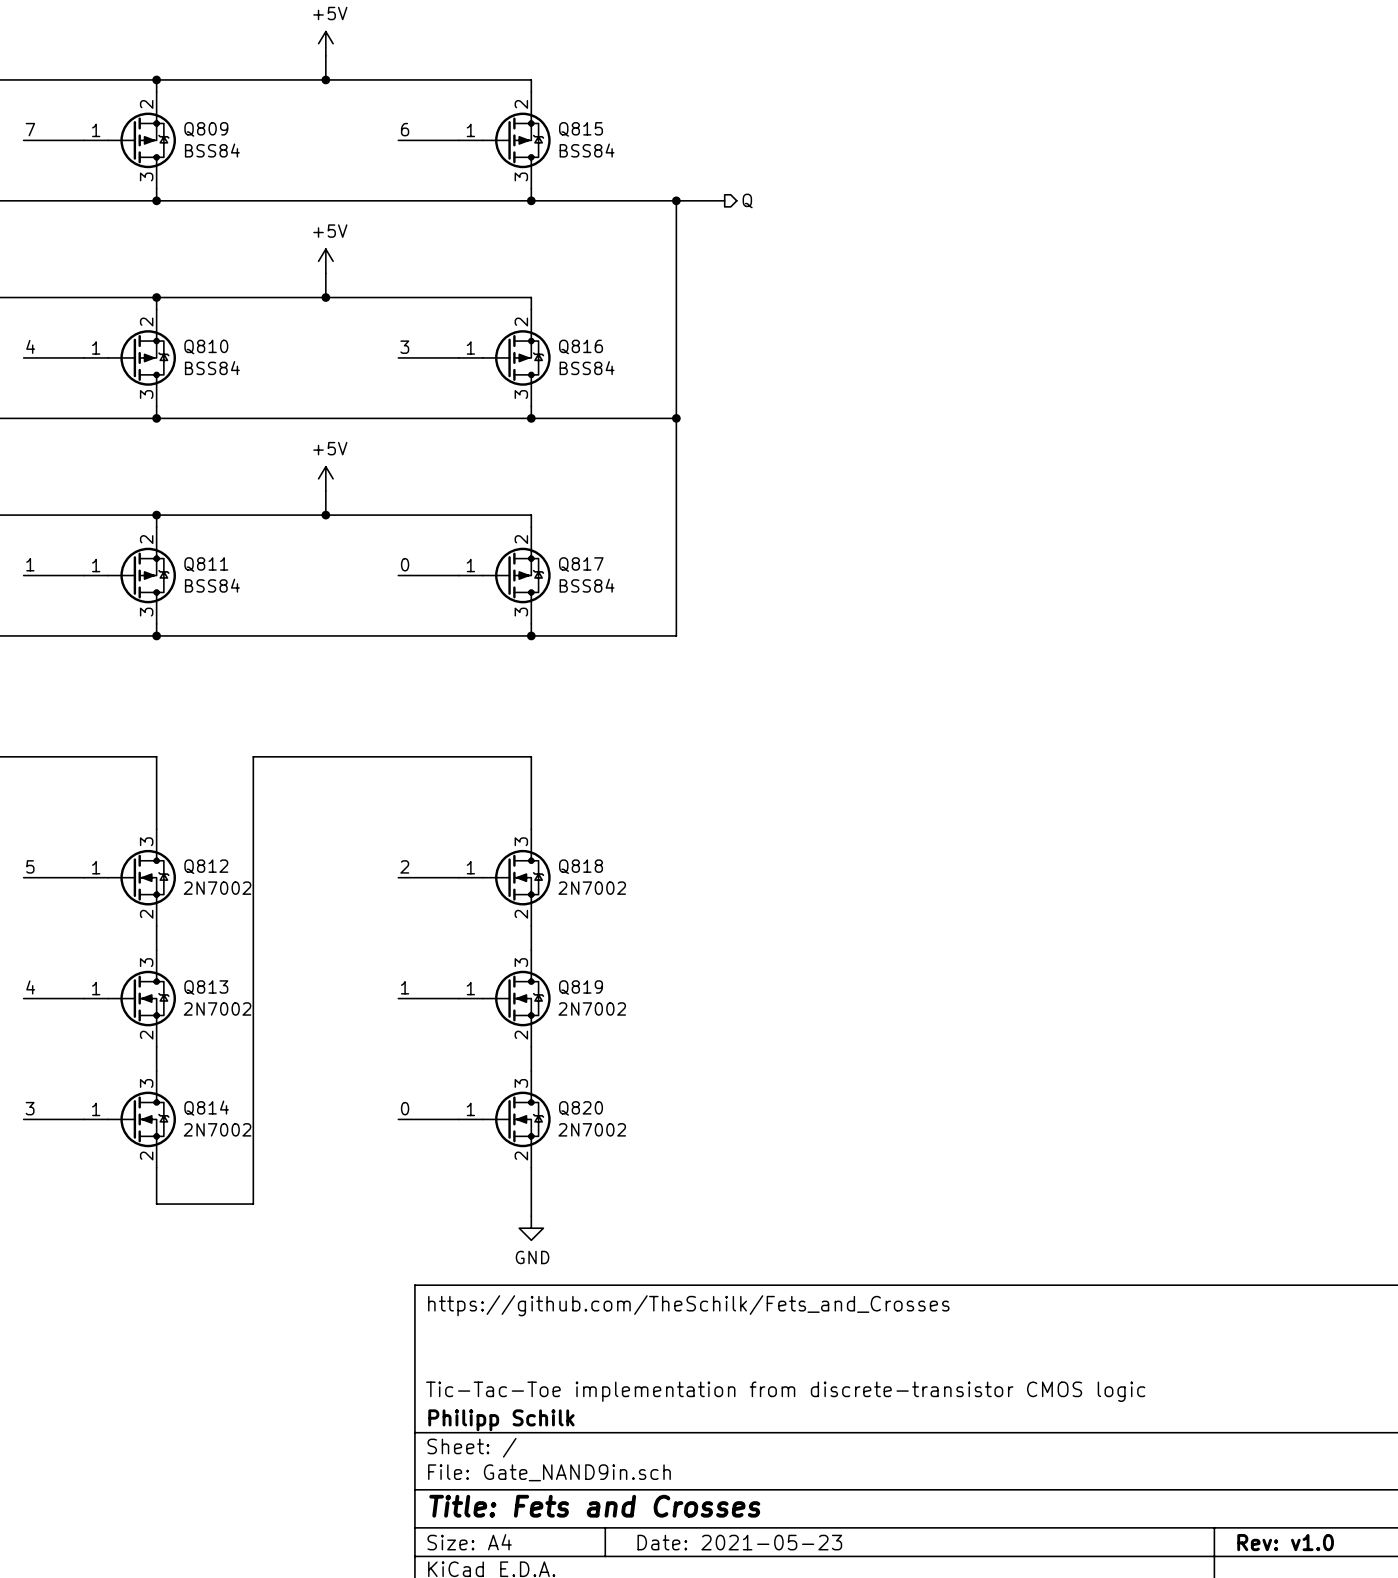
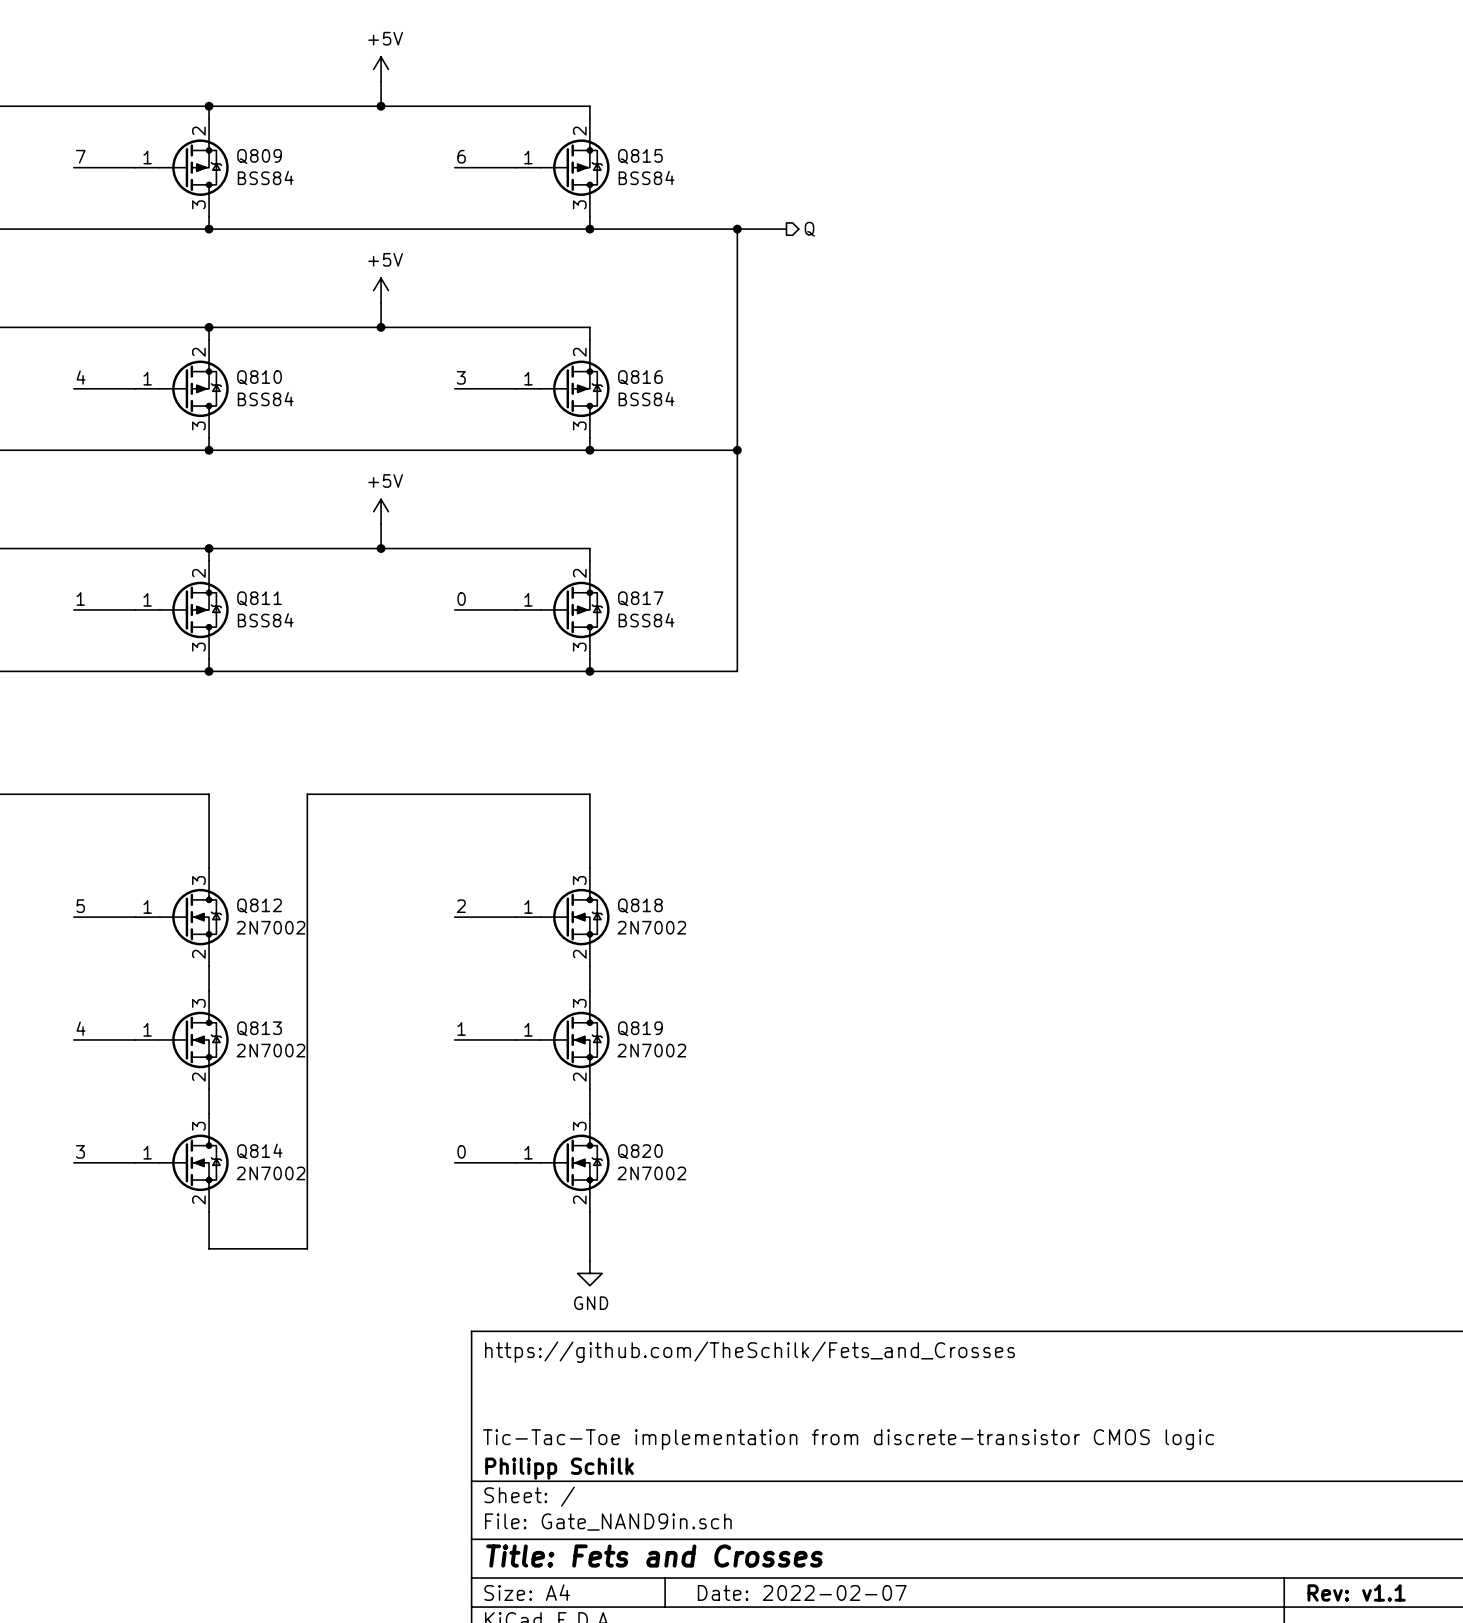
title block: Date: 2021-05-23 (739, 1542) -> Date: 2022-02-07 (802, 1592)
title block: Rev: v1.0 (1285, 1542) -> Rev: v1.1 (1356, 1592)

